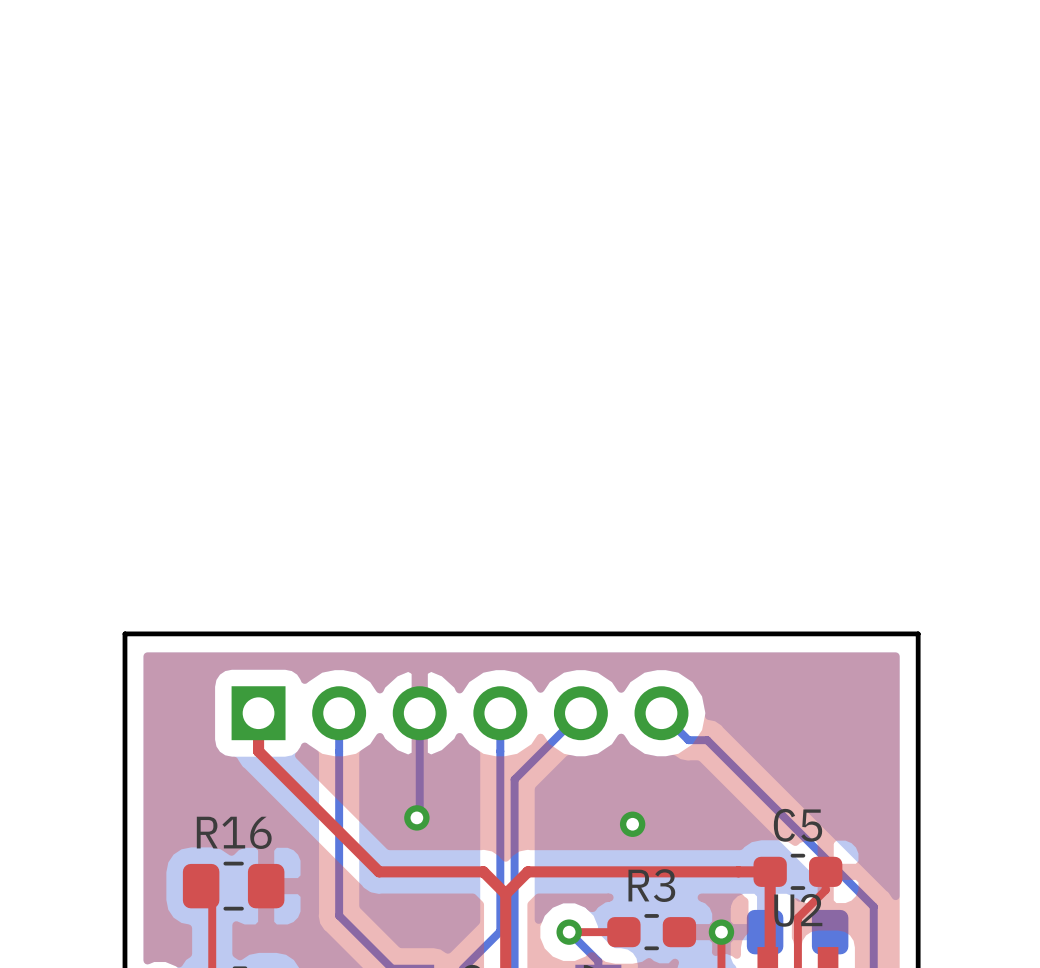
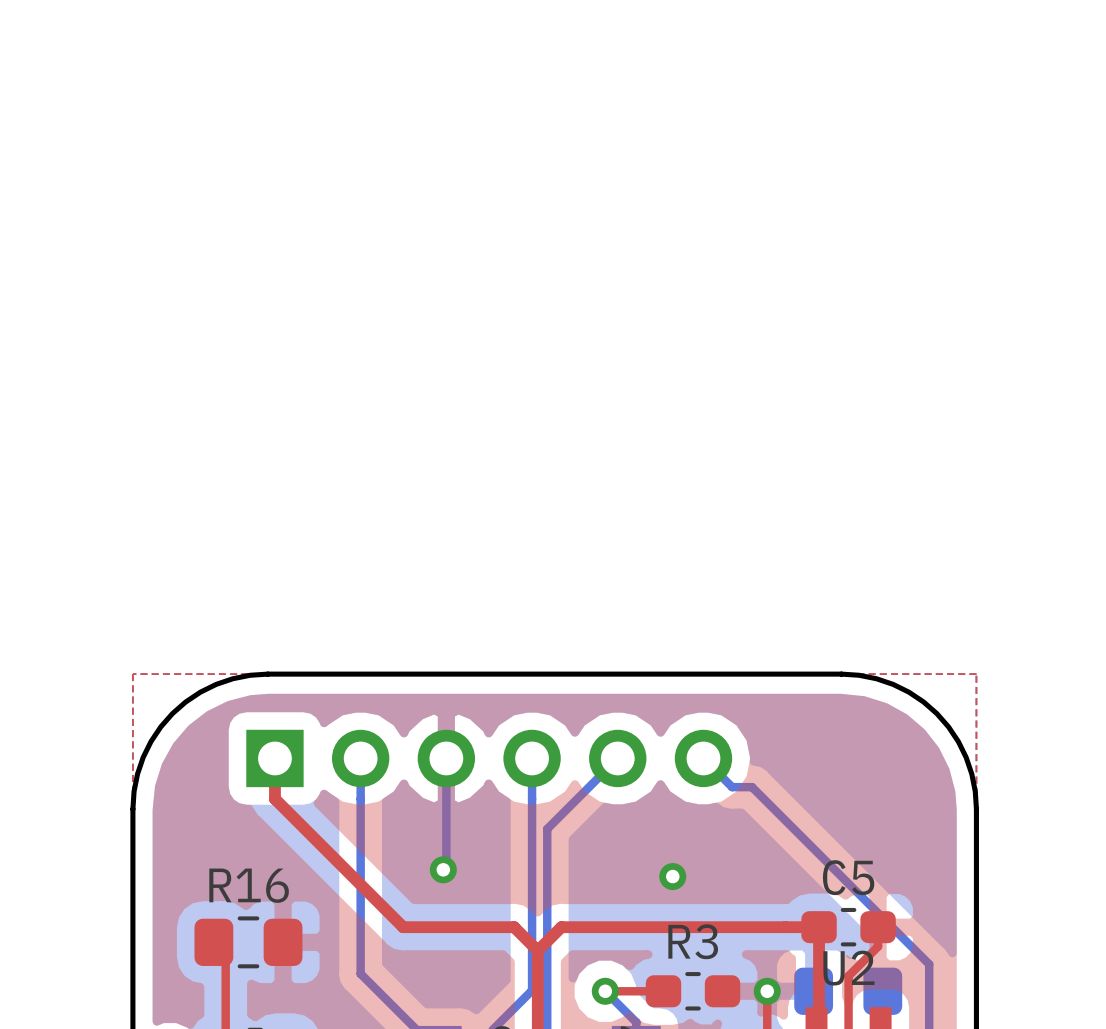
board edge: (251, 633) (124, 633) (124, 760) -> (267, 674) (250, 675) (216, 684) (185, 702) (172, 713) (160, 726) (143, 757) (137, 774) (132, 809)
board edge: (791, 633) (918, 633) (918, 760) -> (841, 674) (859, 675) (893, 684) (923, 702) (936, 713) (958, 741) (966, 757) (971, 774) (976, 809)

